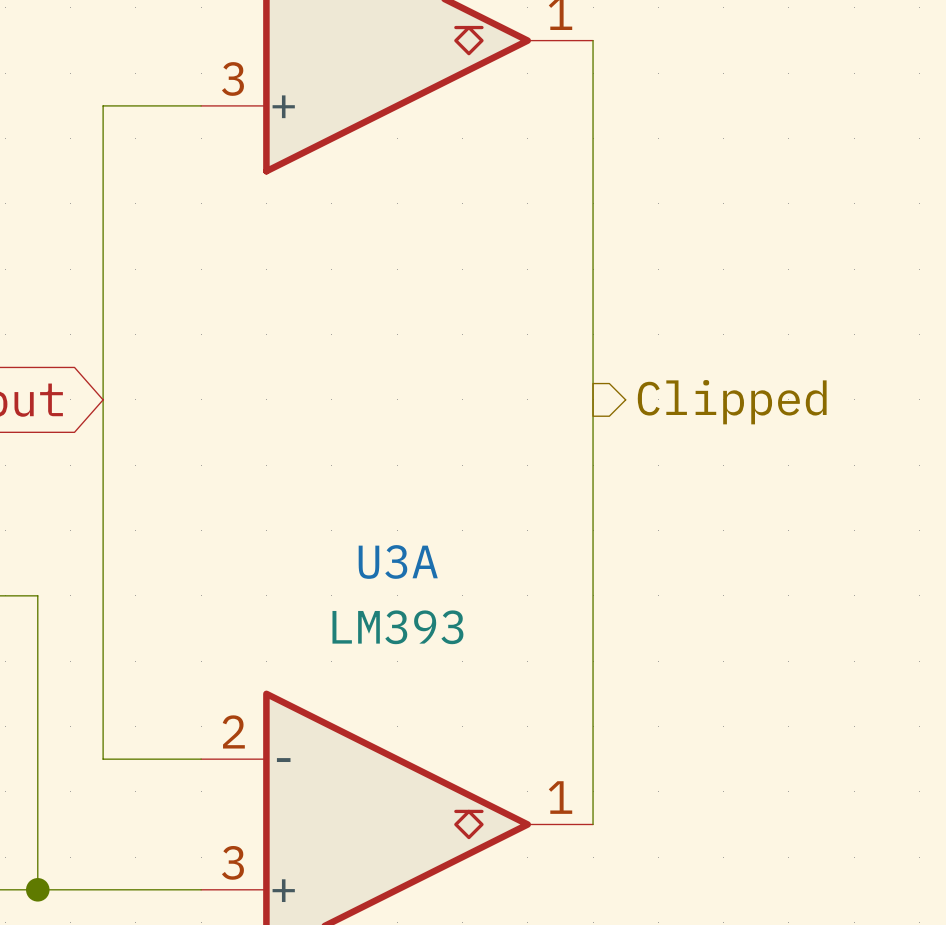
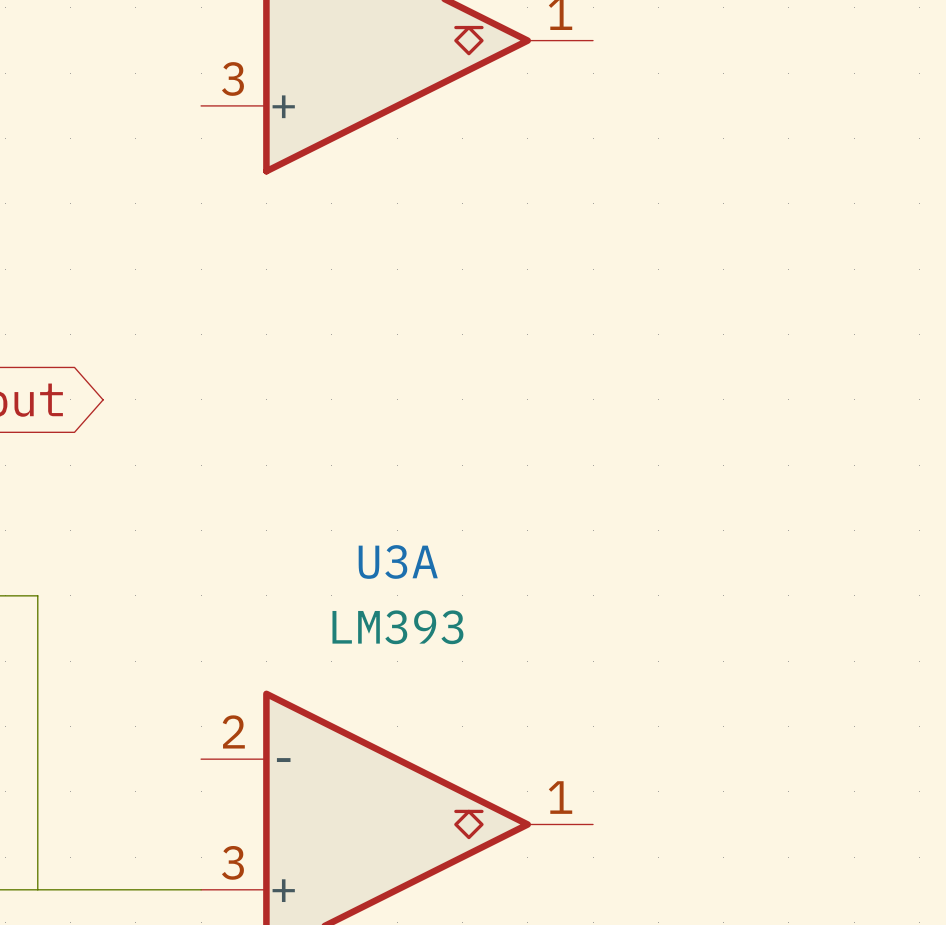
wire: (593, 40) (593, 824) -> none
wire: (201, 105) (103, 105) (103, 759) (201, 759) -> none
hierarchical label: Clipped (732, 402) -> none
junction: (37, 889) -> none

